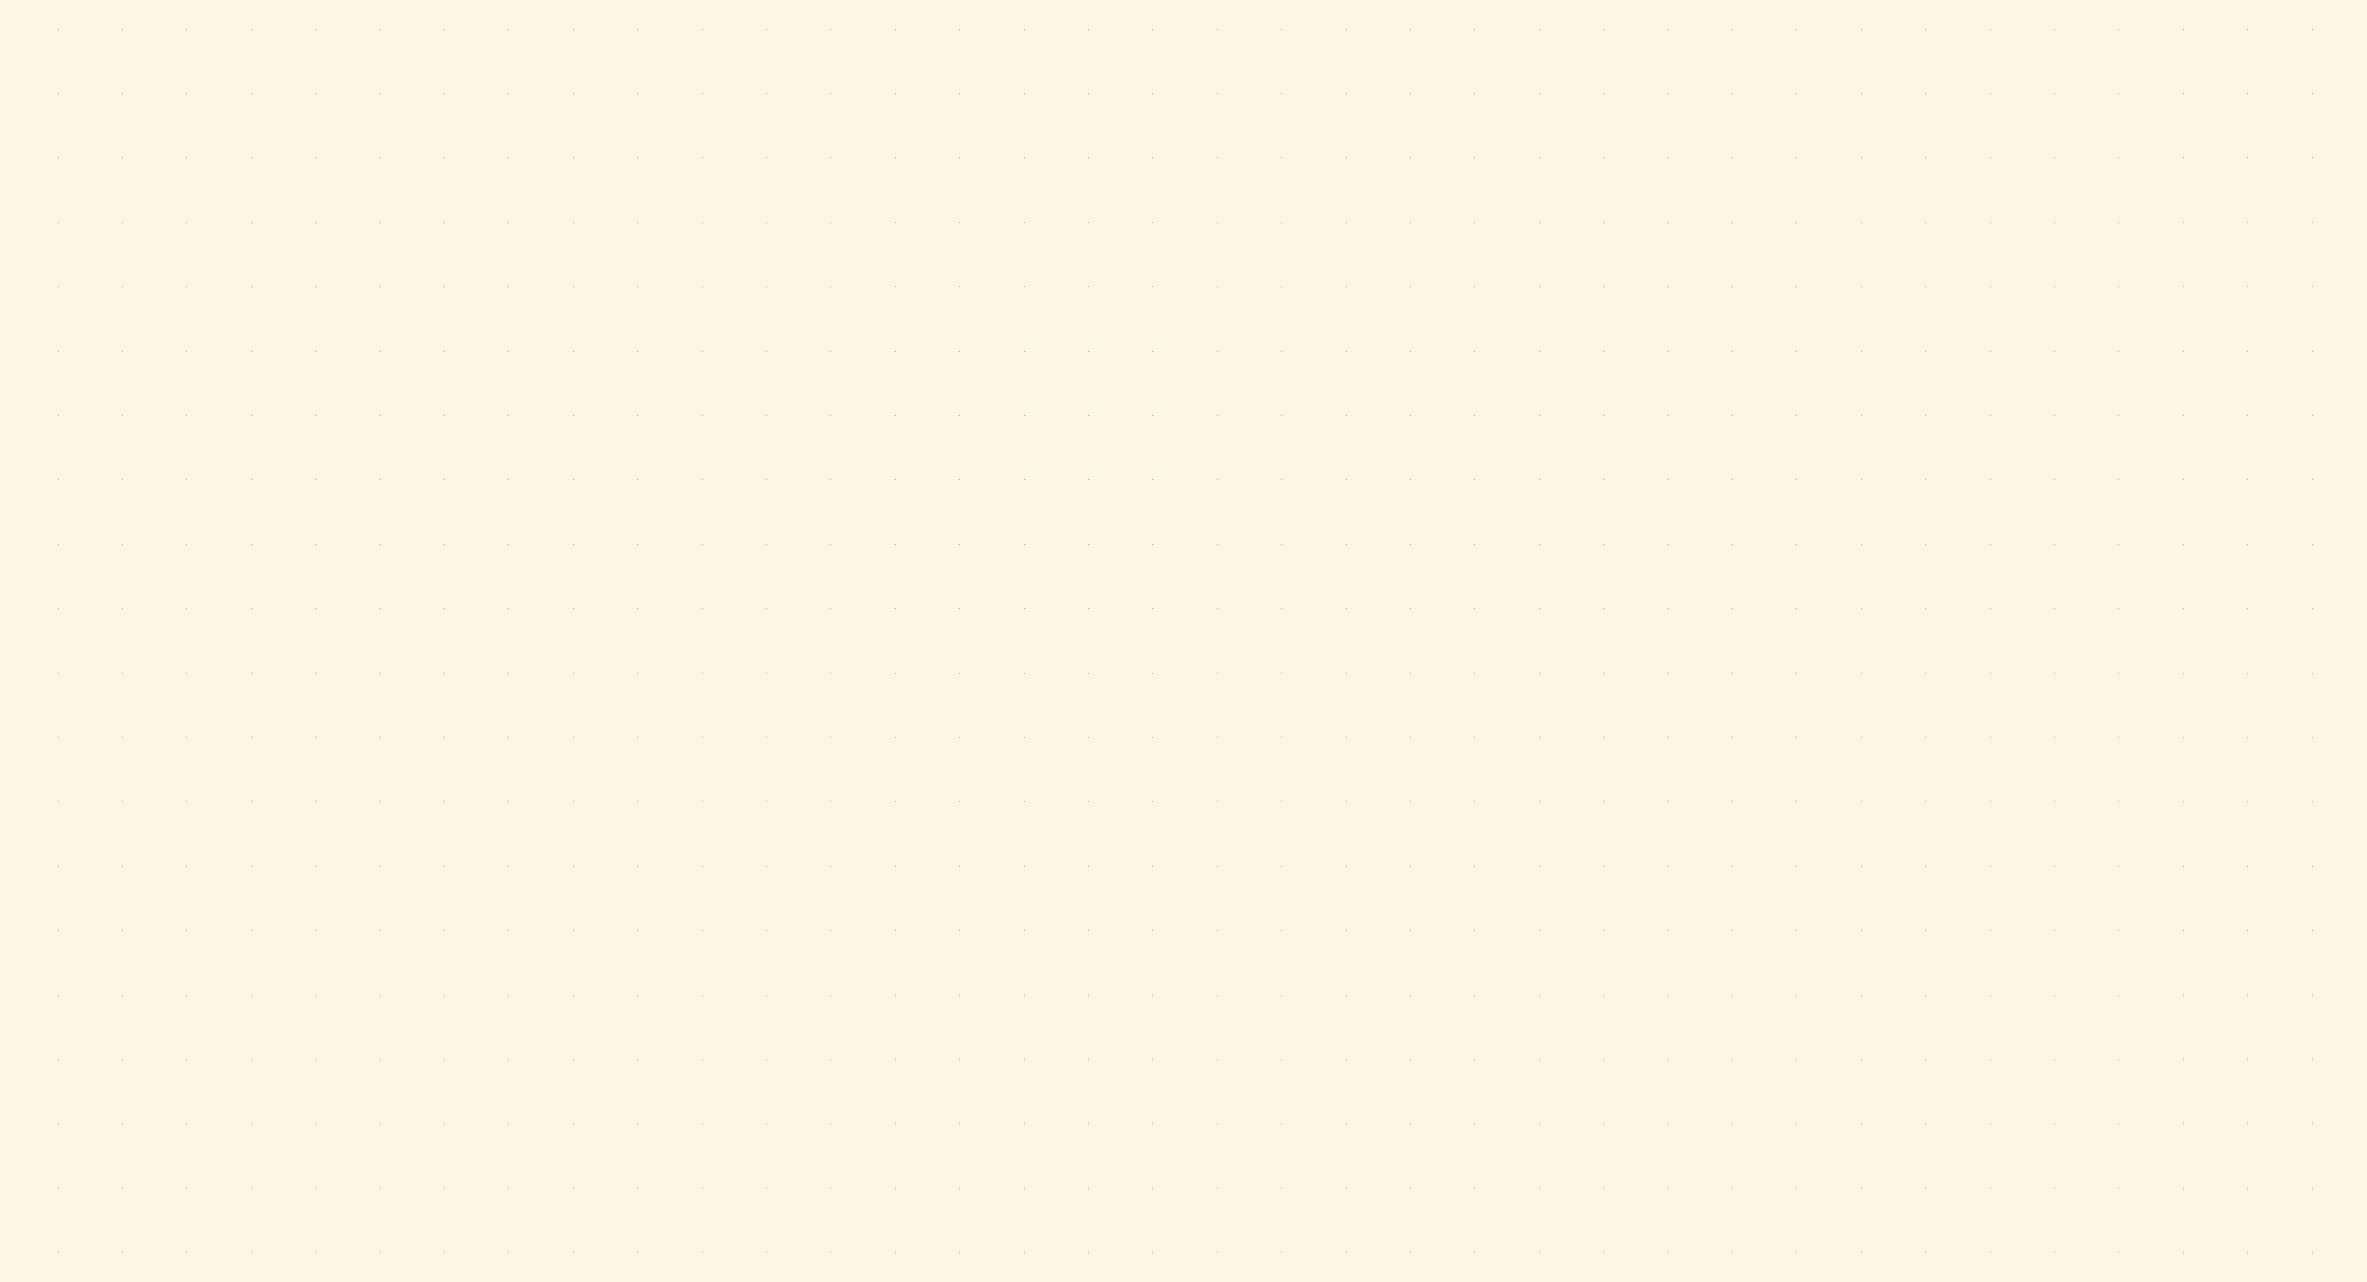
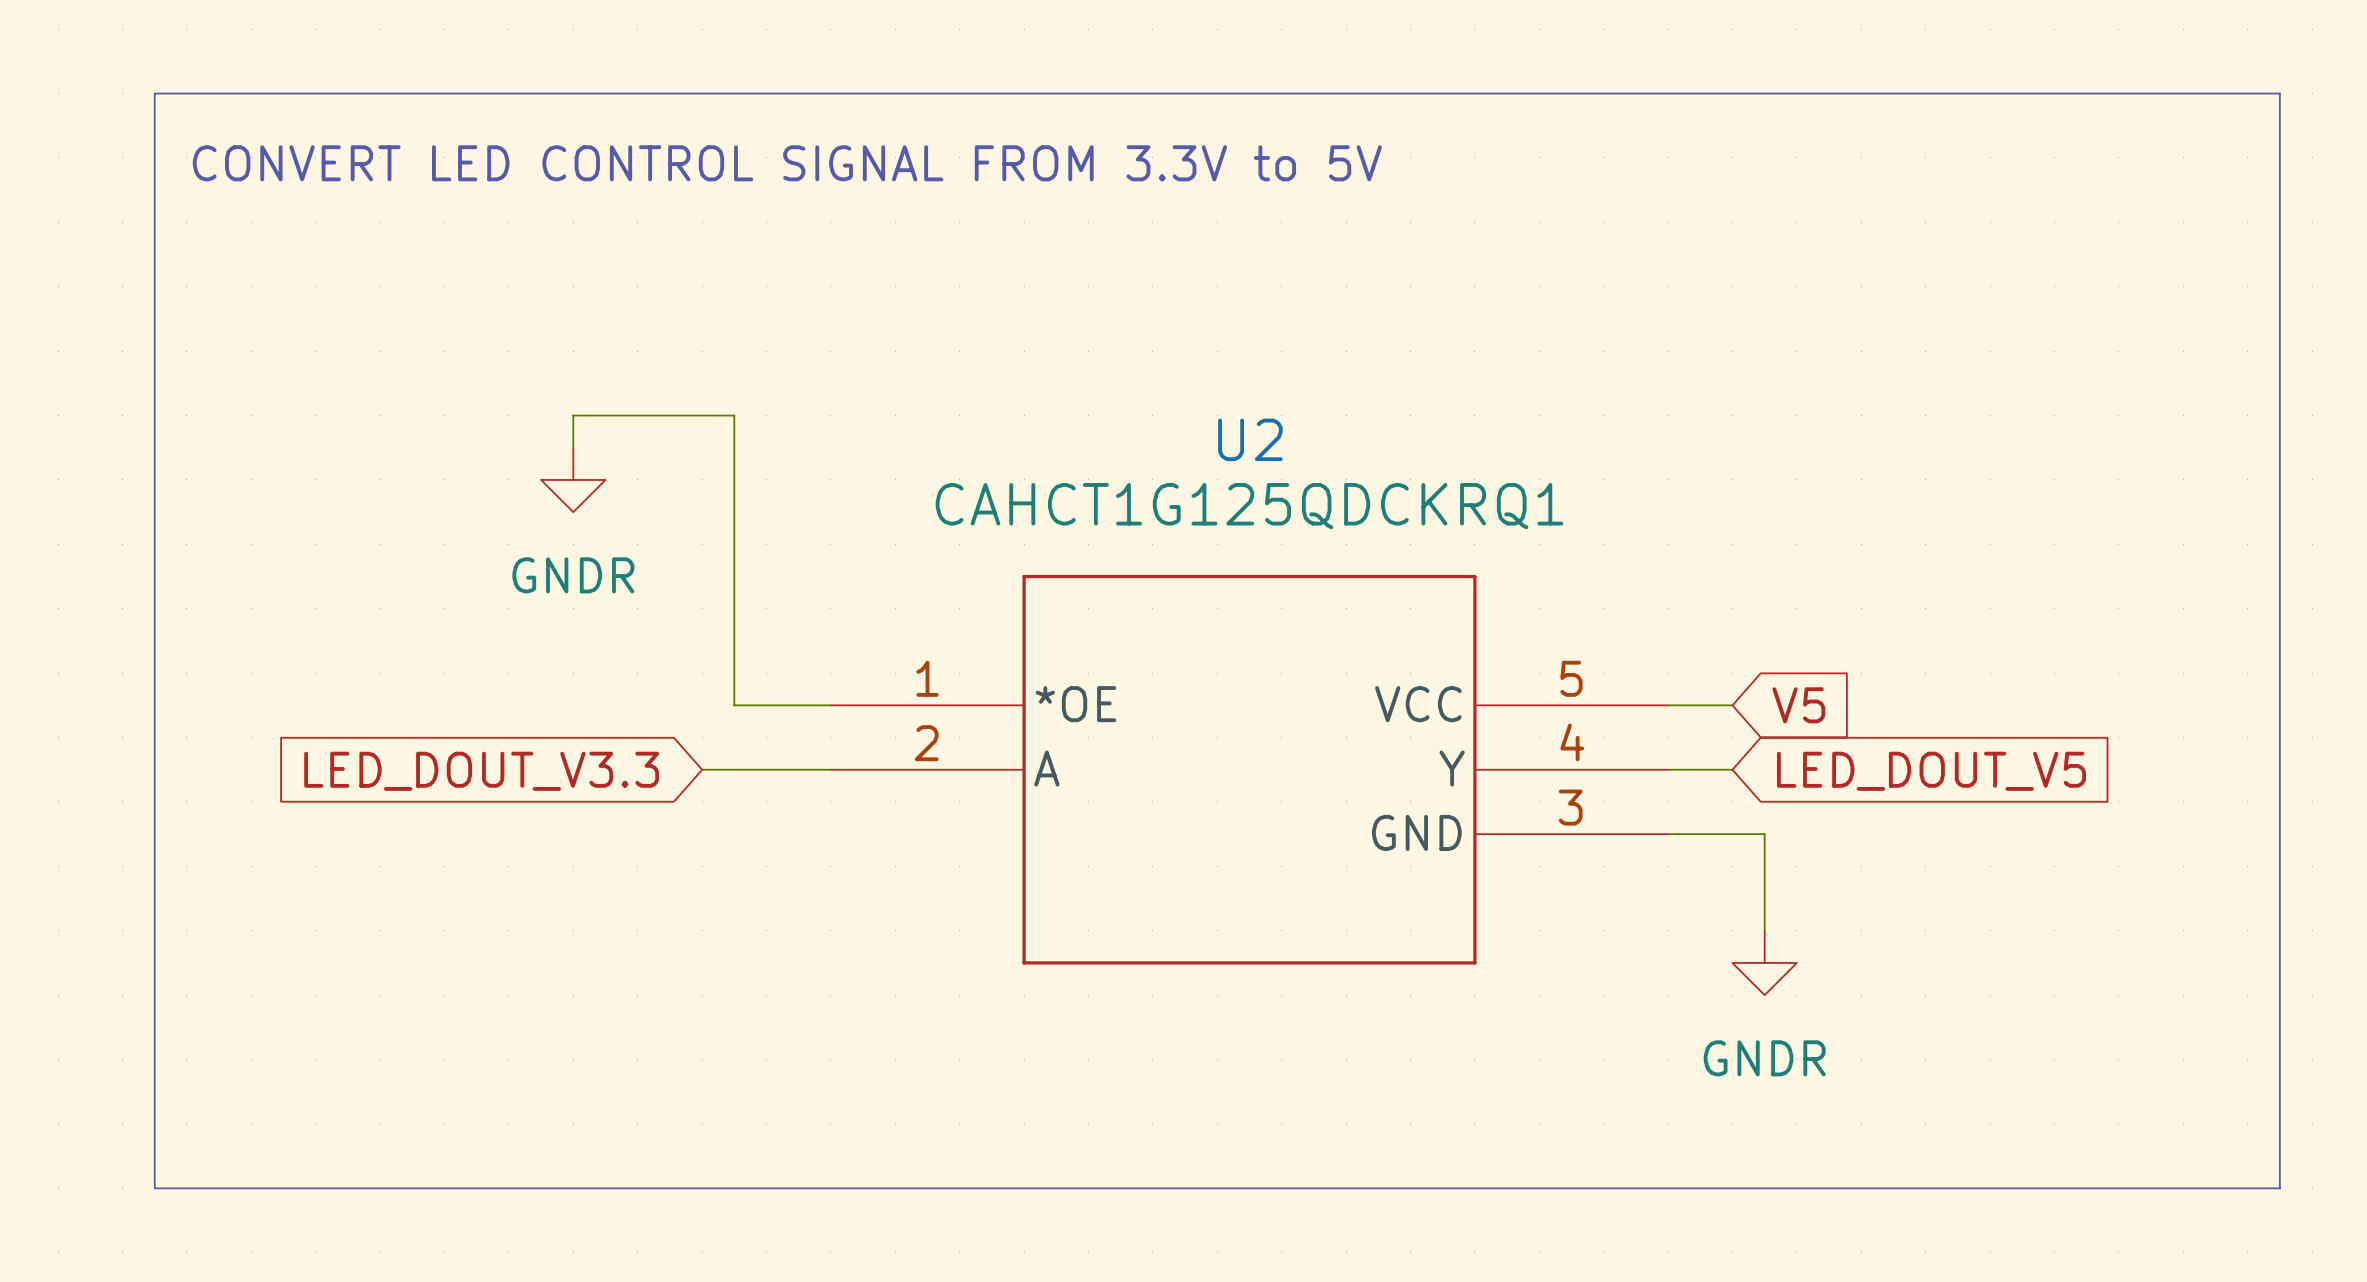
line: none -> (154, 93) (2279, 93) (2279, 1188) (154, 1188) (154, 93)
text: none -> CONVERT LED CONTROL SIGNAL FROM 3.3V to 5V (787, 163)
wire: none -> (573, 447) (573, 415) (734, 415) (734, 705) (830, 705)
power symbol: none -> GNDR (573, 479)
wire: none -> (1668, 705) (1732, 705)
global label: none -> V5 (1798, 705)
wire: none -> (702, 769) (830, 769)
U2: none -> CAHCT1G125QDCKRQ1 (1249, 769)
wire: none -> (1668, 769) (1732, 769)
global label: none -> LED_DOUT_V3.3 (481, 771)
global label: none -> LED_DOUT_V5 (1931, 771)
wire: none -> (1668, 834) (1764, 834) (1764, 930)
power symbol: none -> GNDR (1764, 962)

